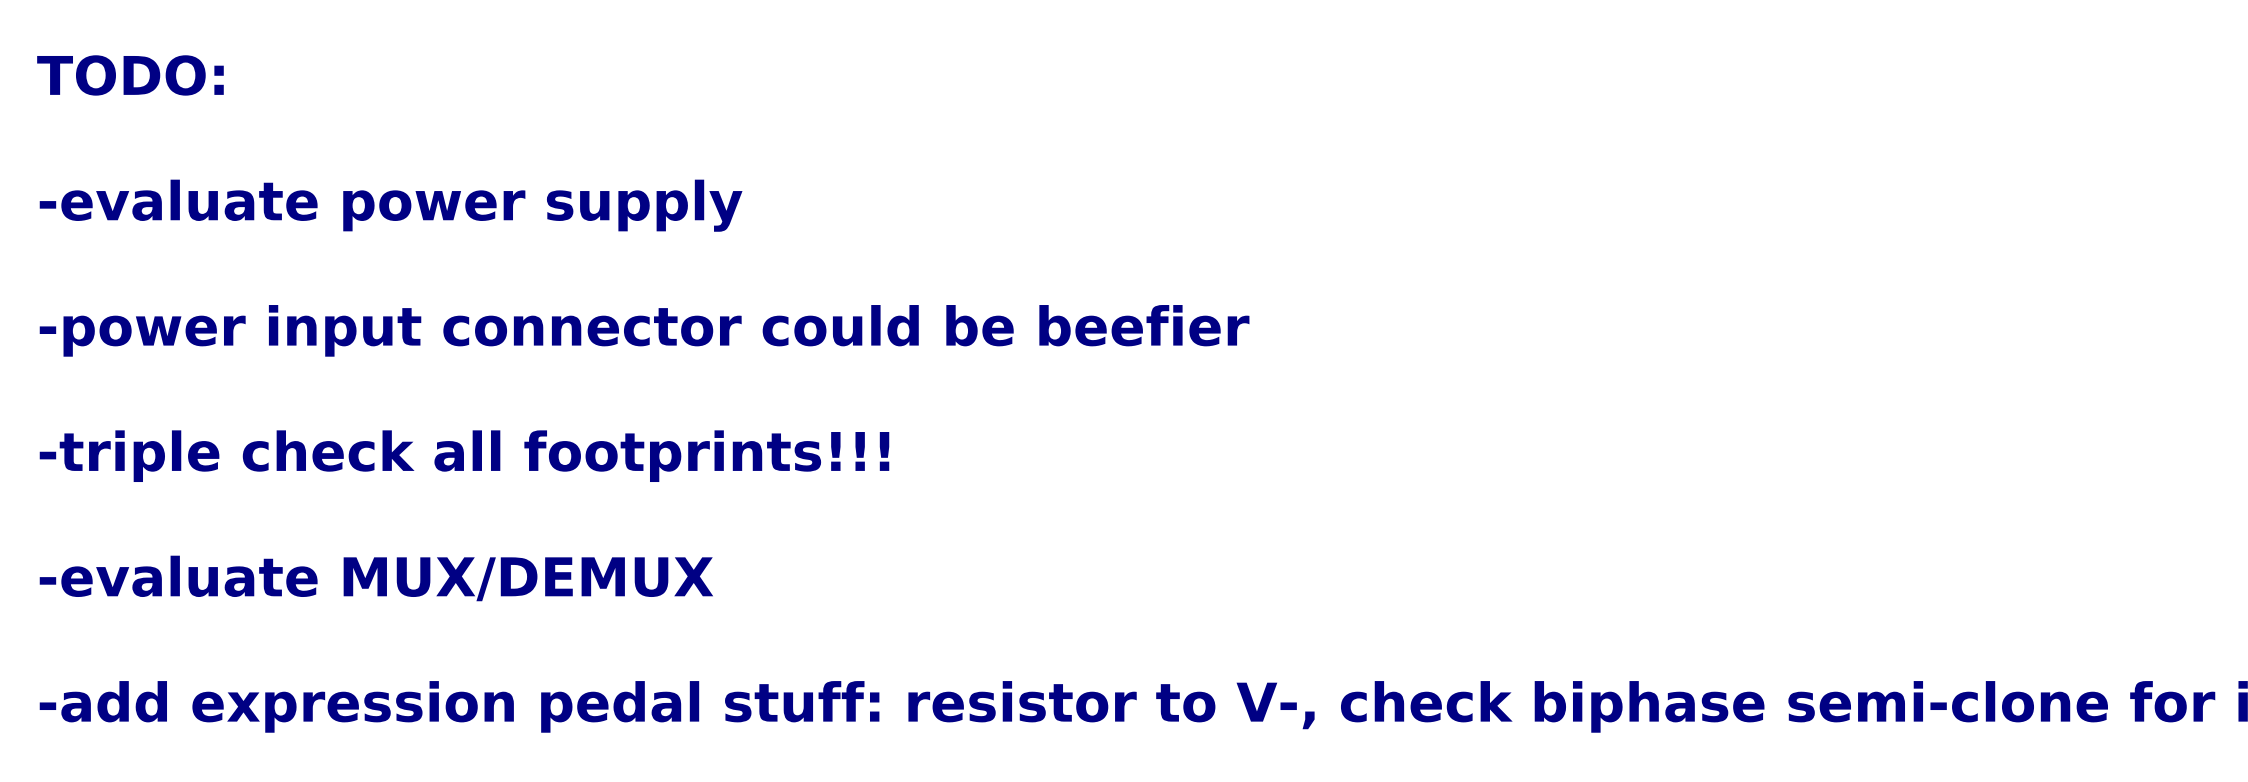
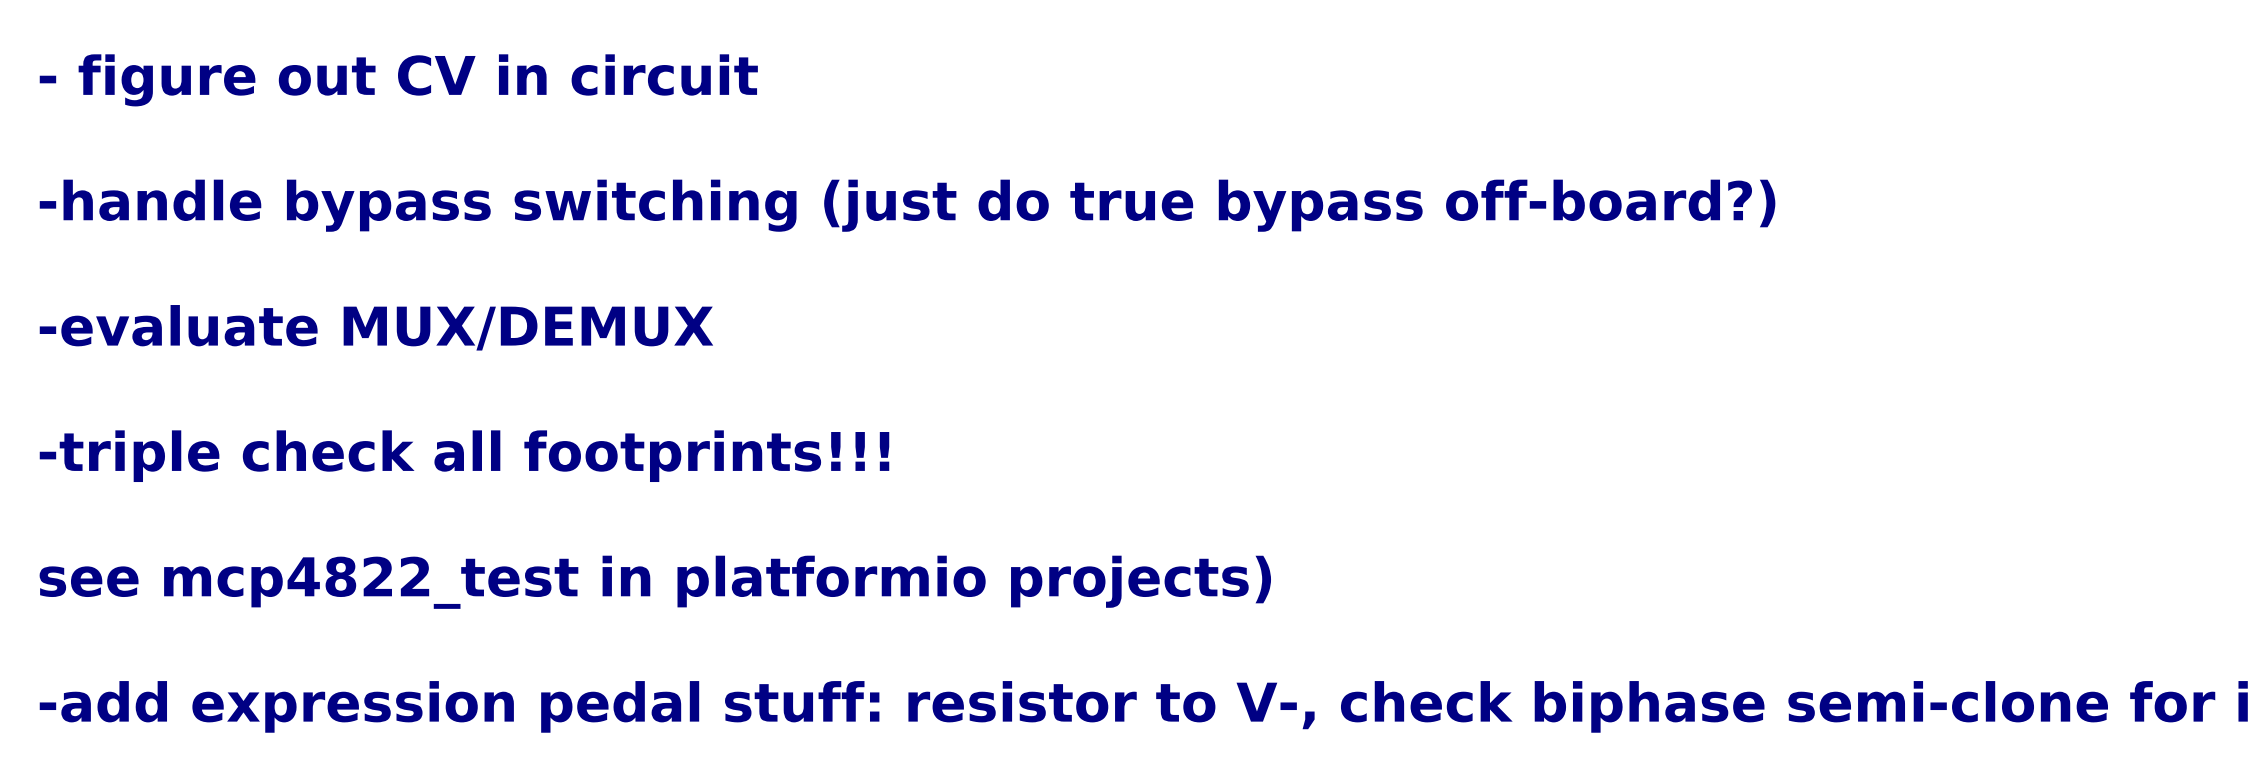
text: TODO: (130, 75) -> - figure out CV in circuit (398, 80)
text: -evaluate power supply (391, 205) -> -handle bypass switching (just do true bypass off-board?) (907, 205)
text: -power input connector could be beefier (644, 330) -> -evaluate MUX/DEMUX (376, 327)
text: -evaluate MUX/DEMUX (376, 578) -> see mcp4822_test in platformio projects) (655, 582)

